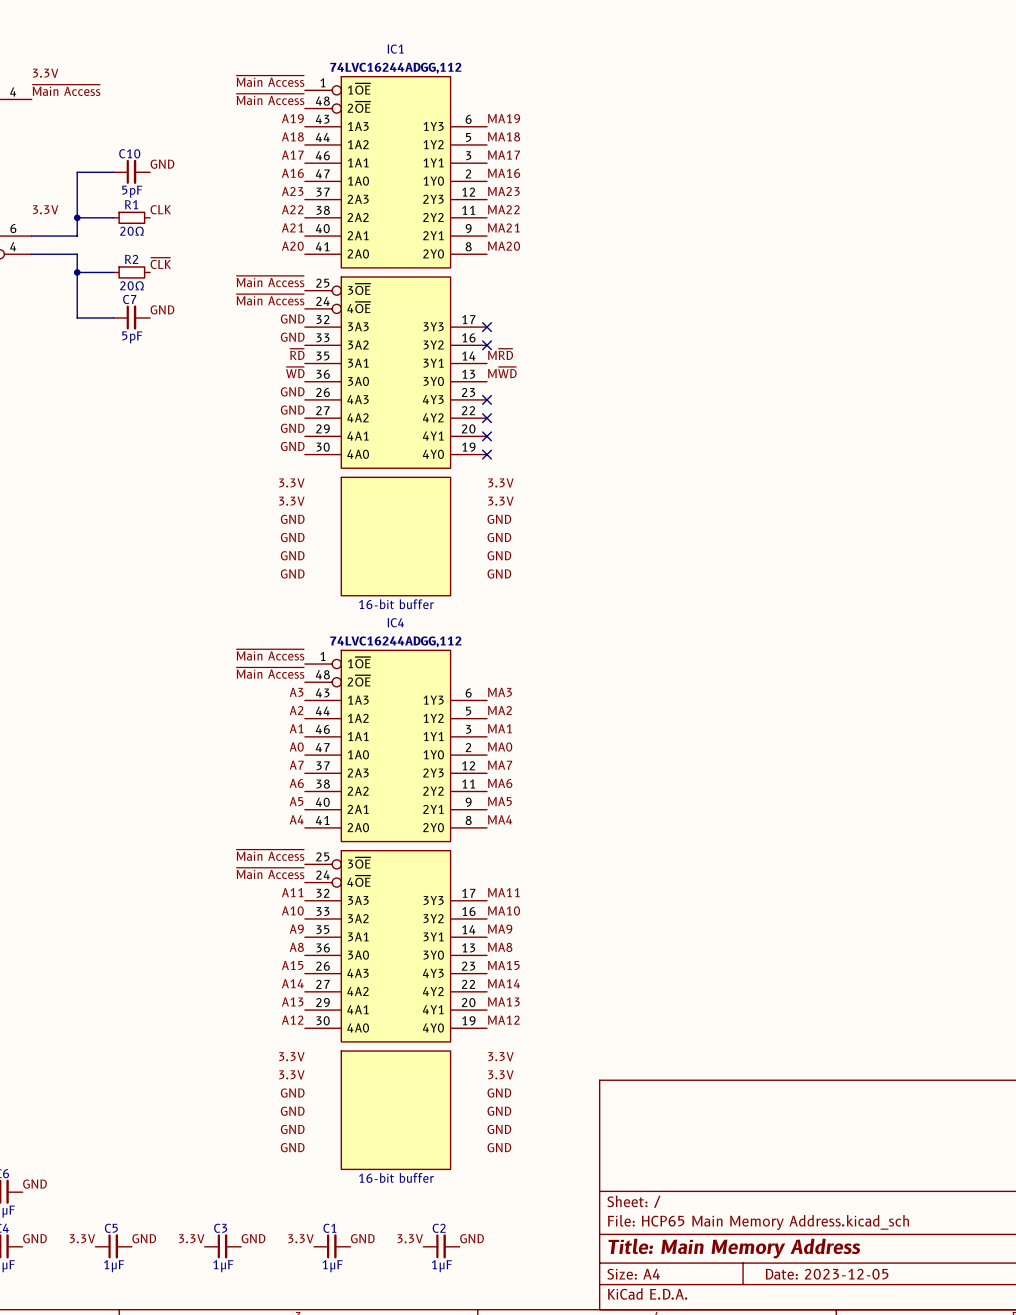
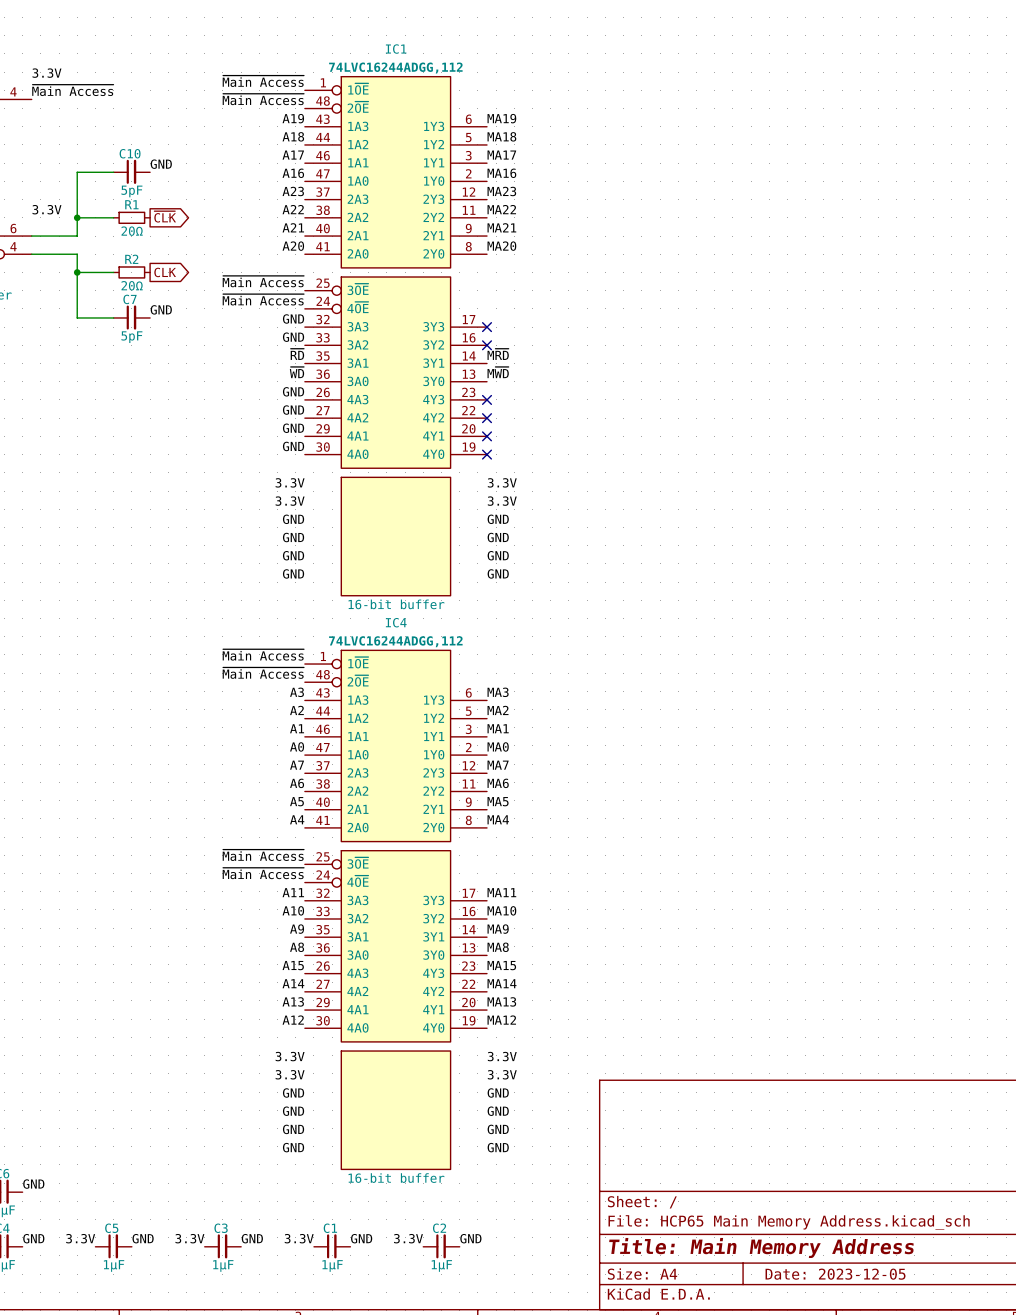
label: CLK (160, 209) -> none
global label: none -> ~{CLK} (165, 216)
label: ~{CLK} (160, 263) -> none
global label: none -> CLK (165, 272)

